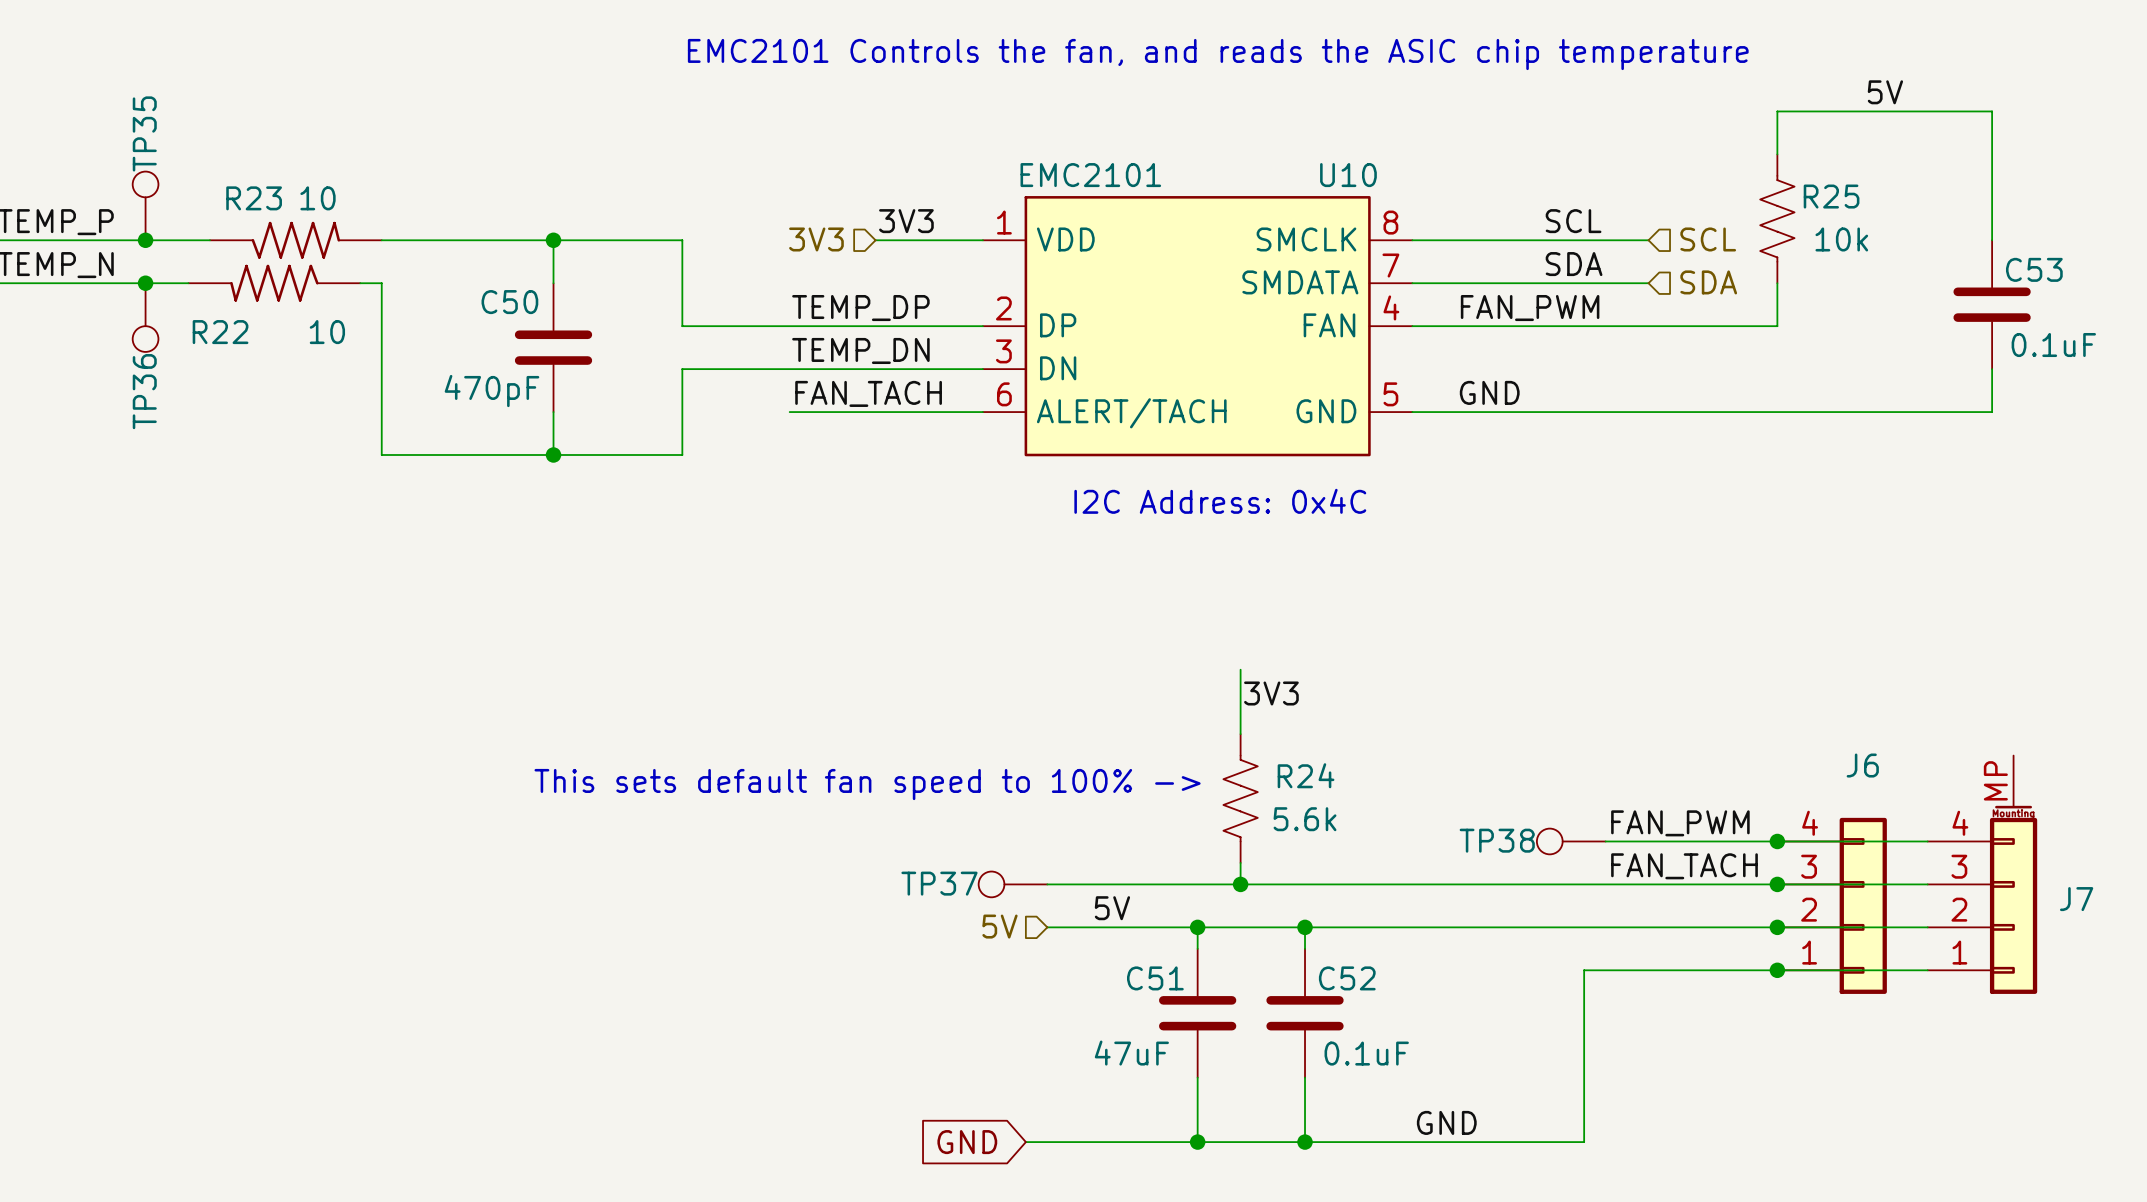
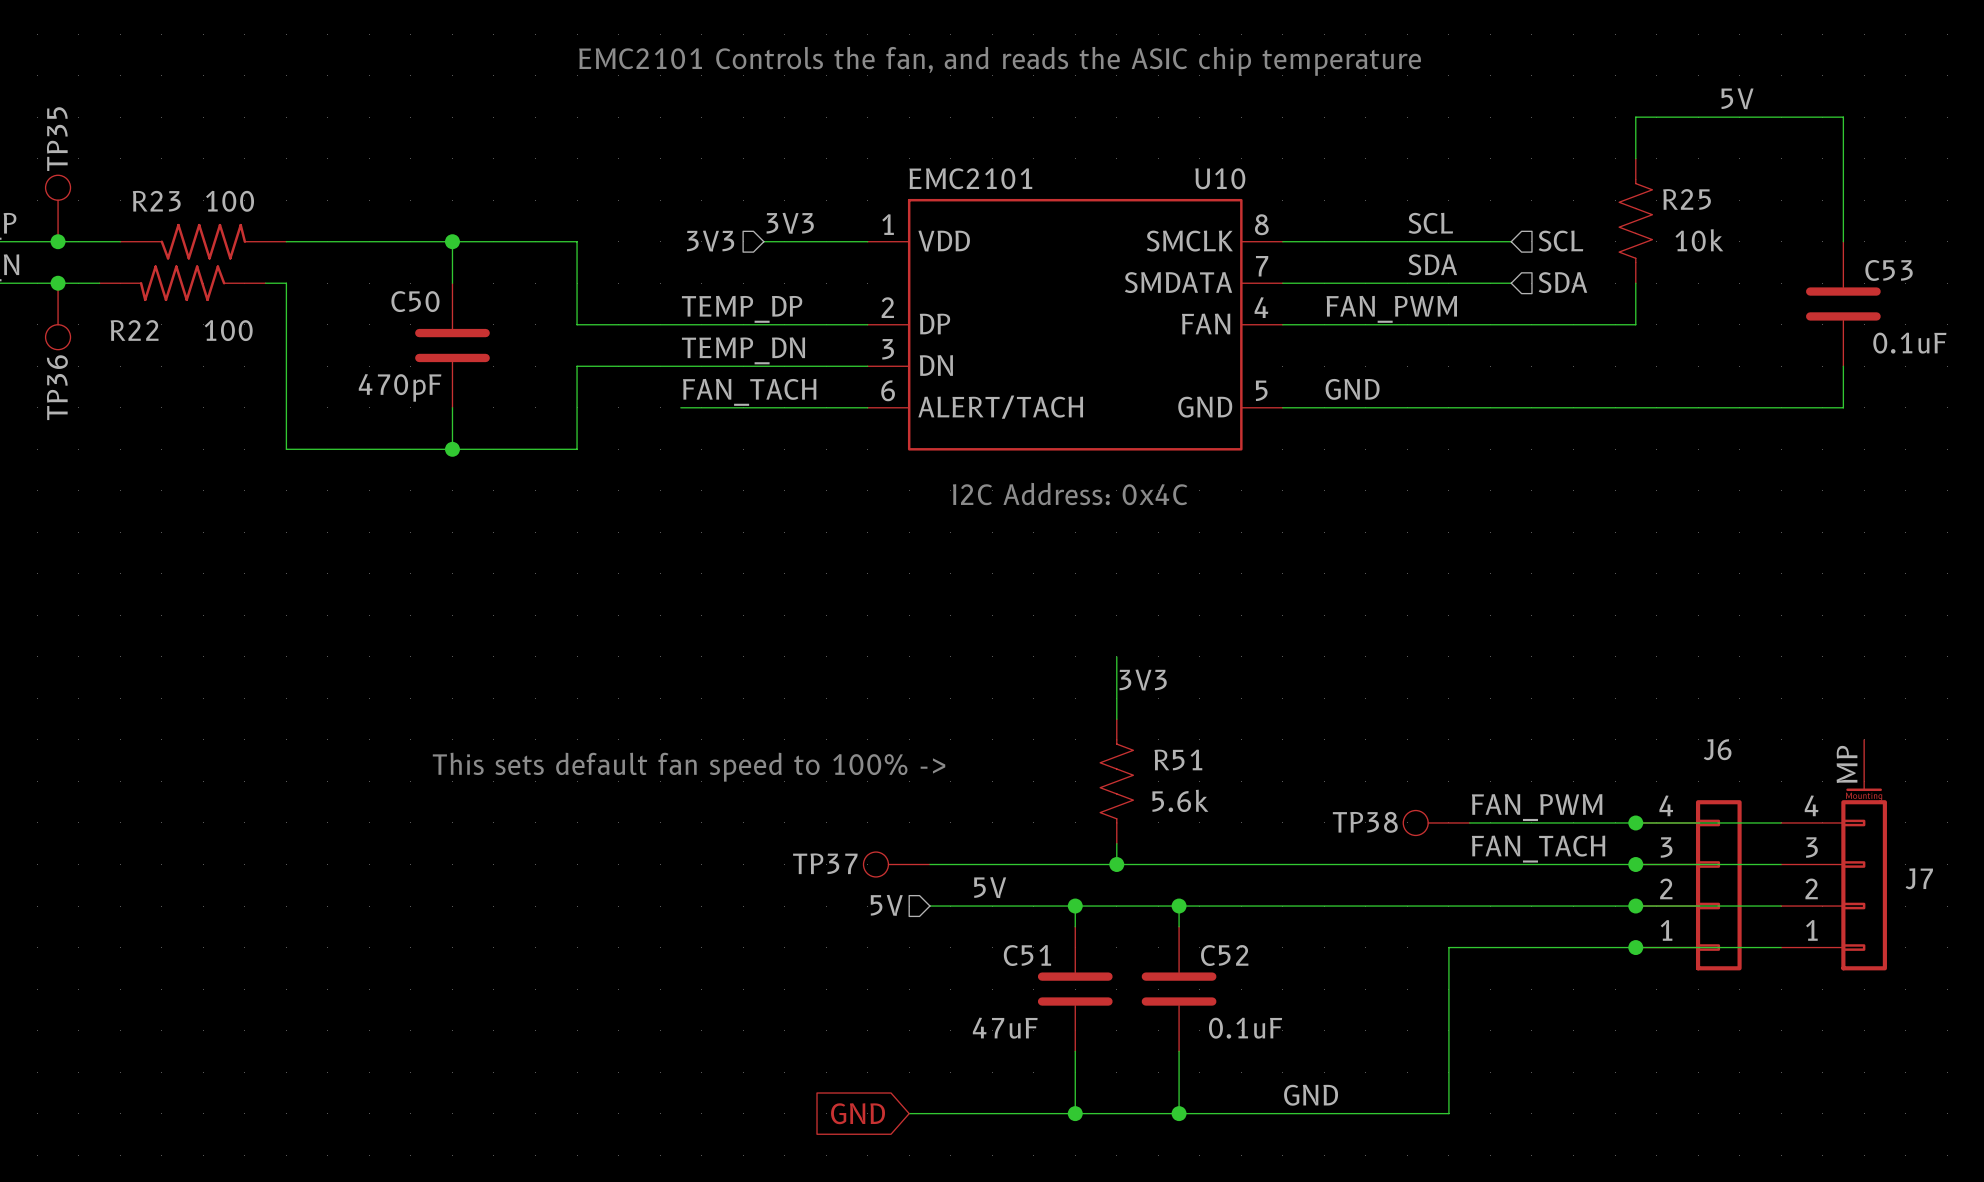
R23 value: 10 (318, 198) -> 100 (230, 201)
R22 value: 10 (327, 332) -> 100 (228, 330)
R24 name: R24 (1306, 775) -> R51 (1178, 759)

